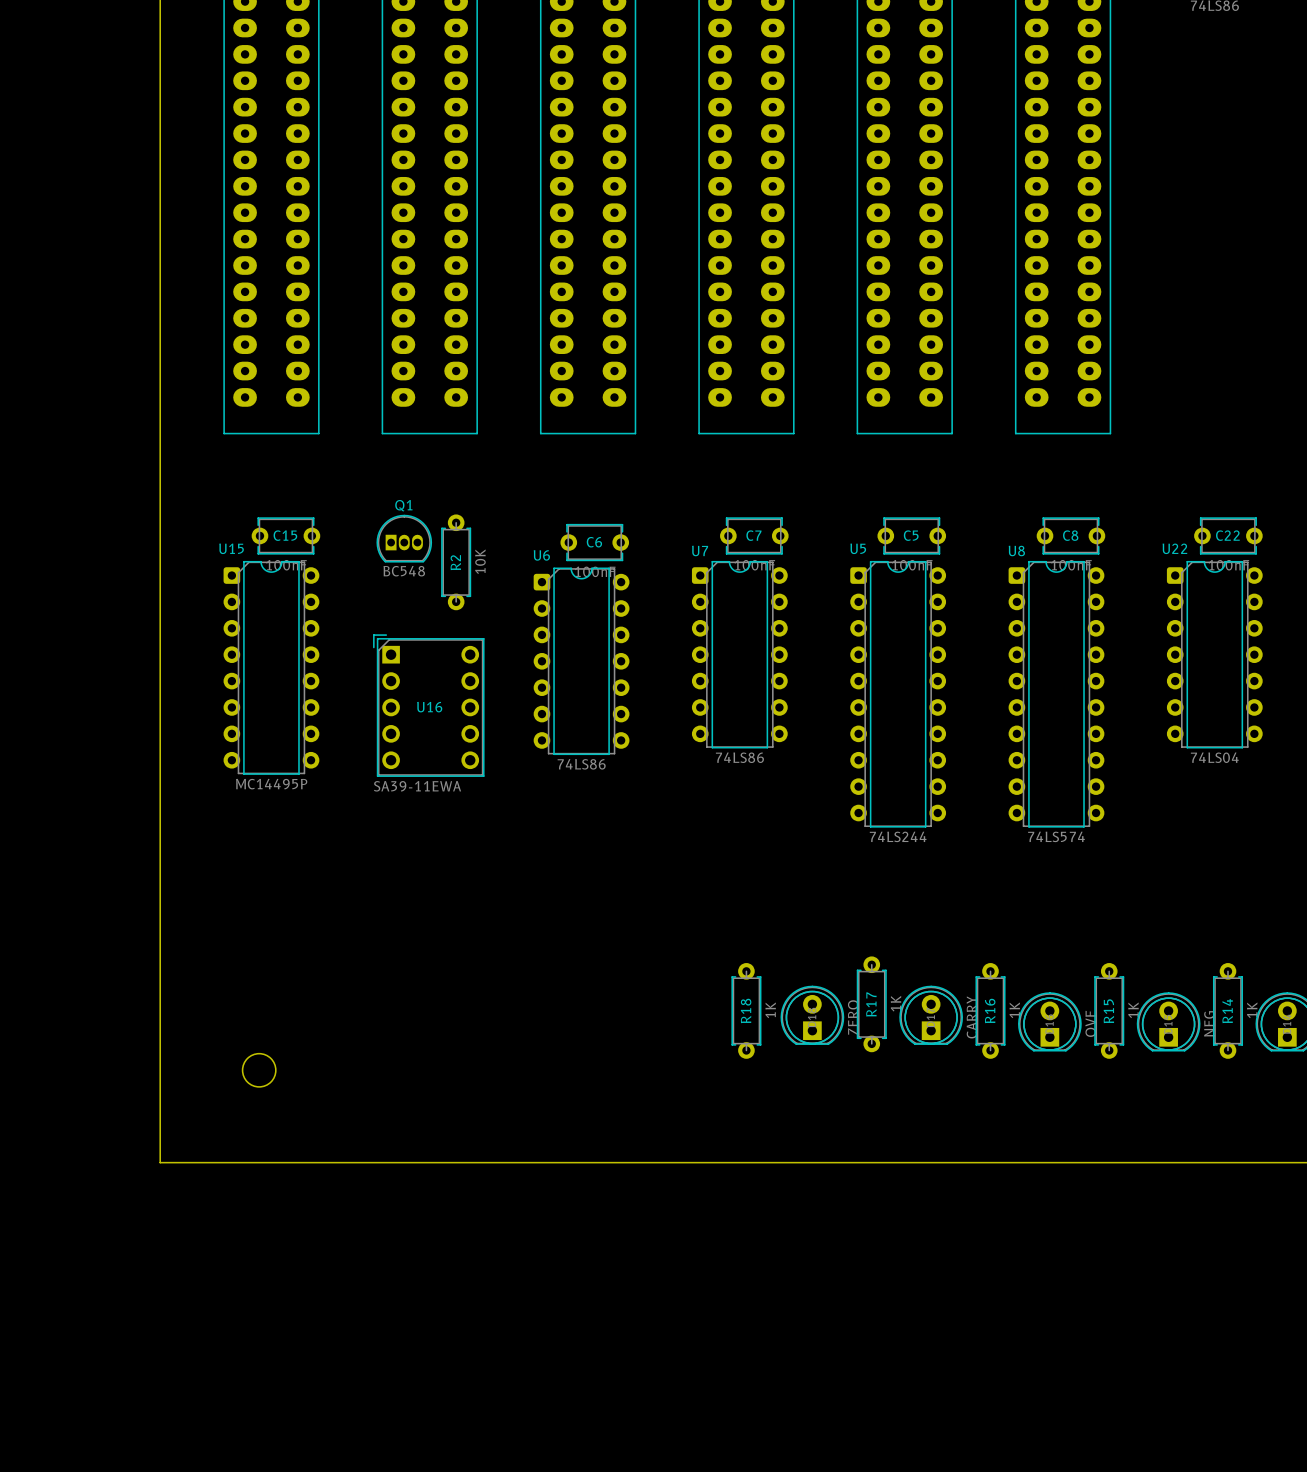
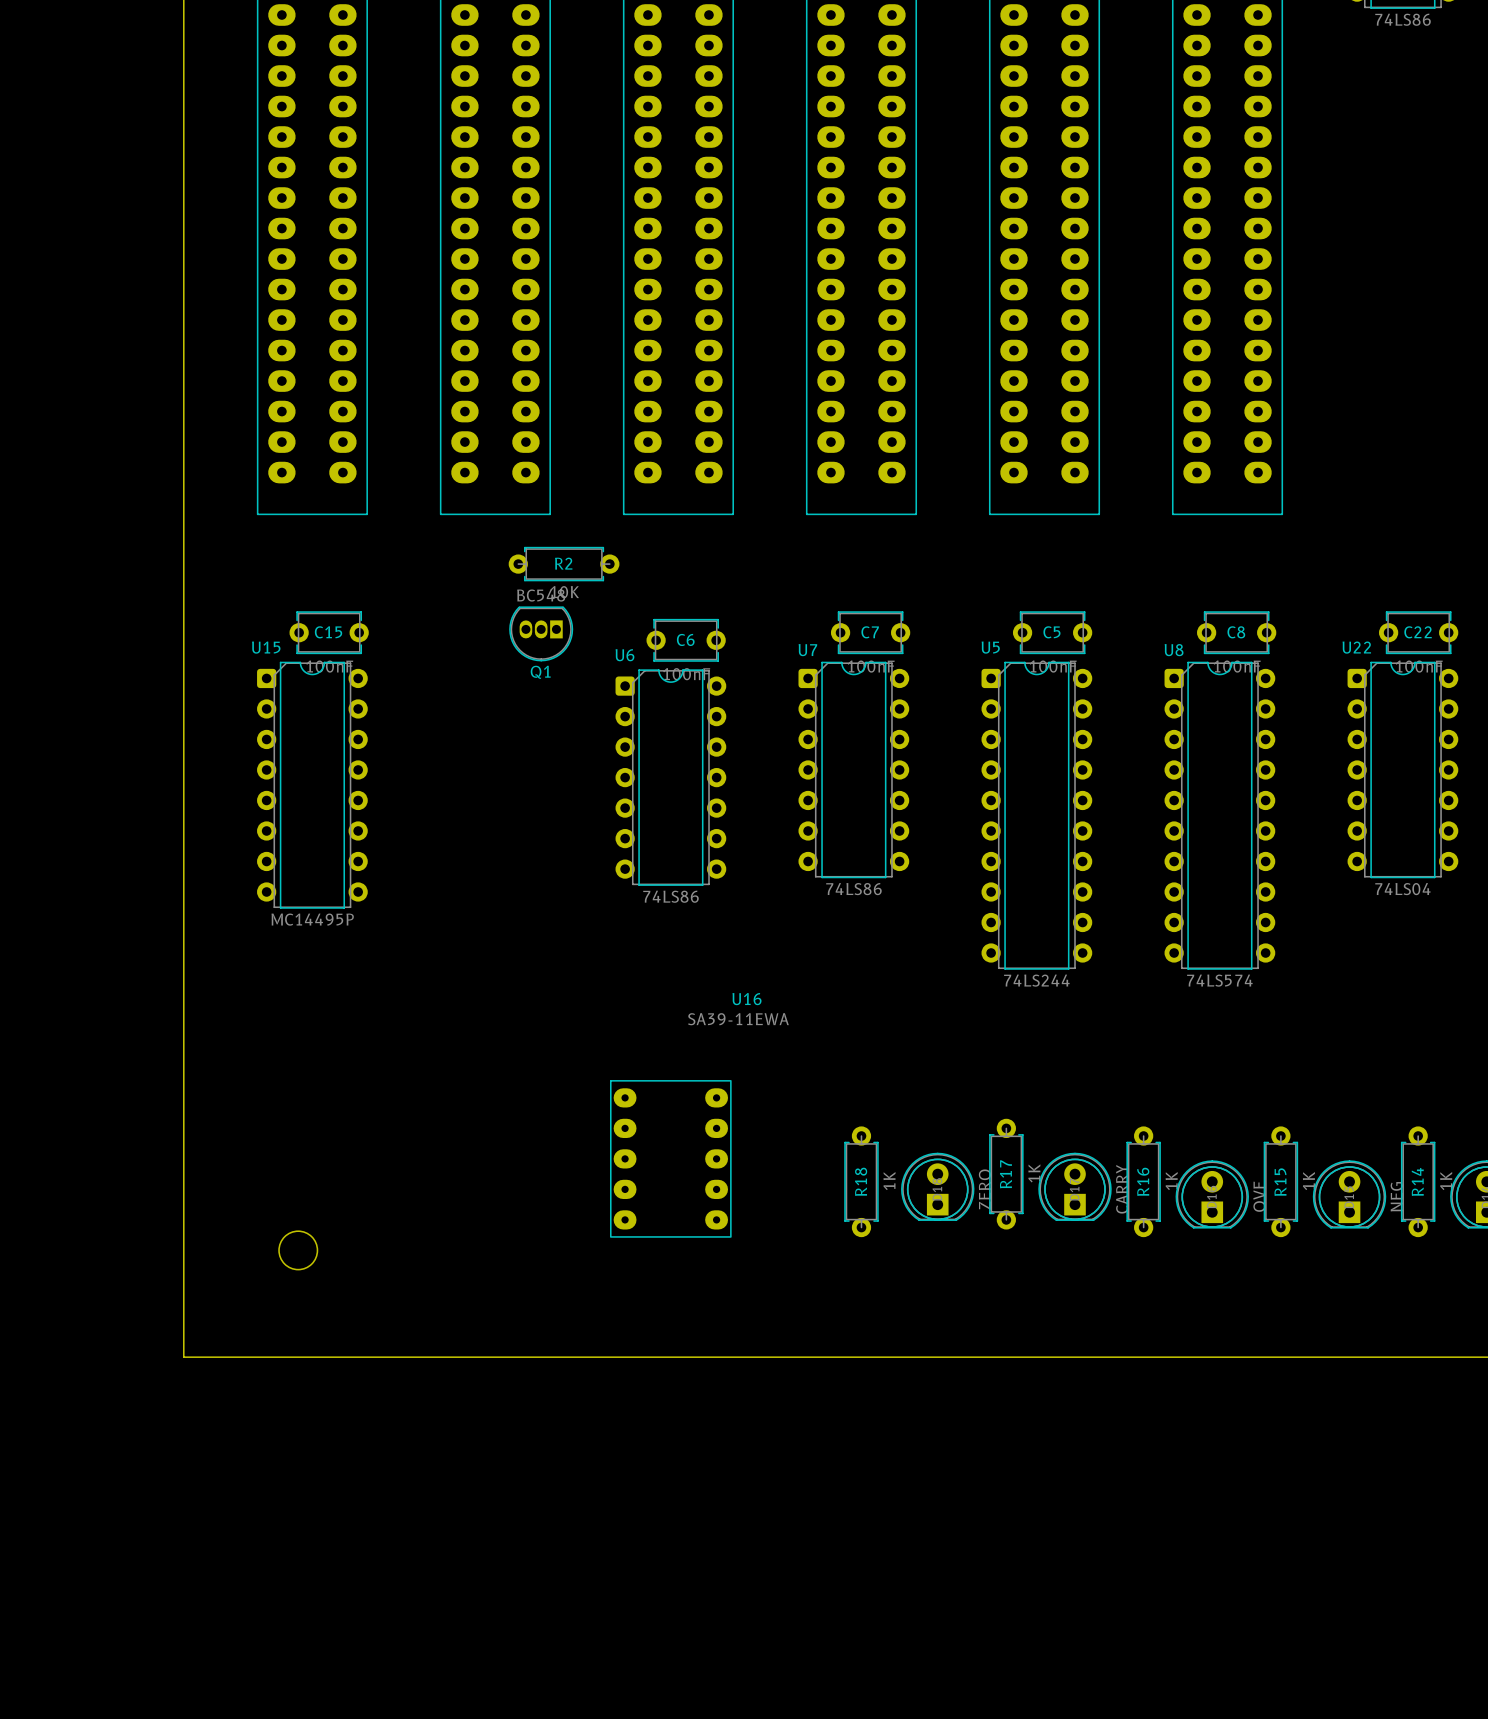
Q1 rotation: 0° (404, 538) -> 180° (541, 633)
Q1 position: (404, 538) -> (541, 633)
R2 rotation: 0° (456, 562) -> 90° clockwise (564, 564)
R2 position: (456, 562) -> (564, 564)
U16 footprint: [373, 634, 485, 777] -> [610, 1080, 732, 1238]
U16 name position: U16 (429, 707) -> U16 (746, 999)
U16 value position: SA39-11EWA (417, 786) -> SA39-11EWA (738, 1019)

